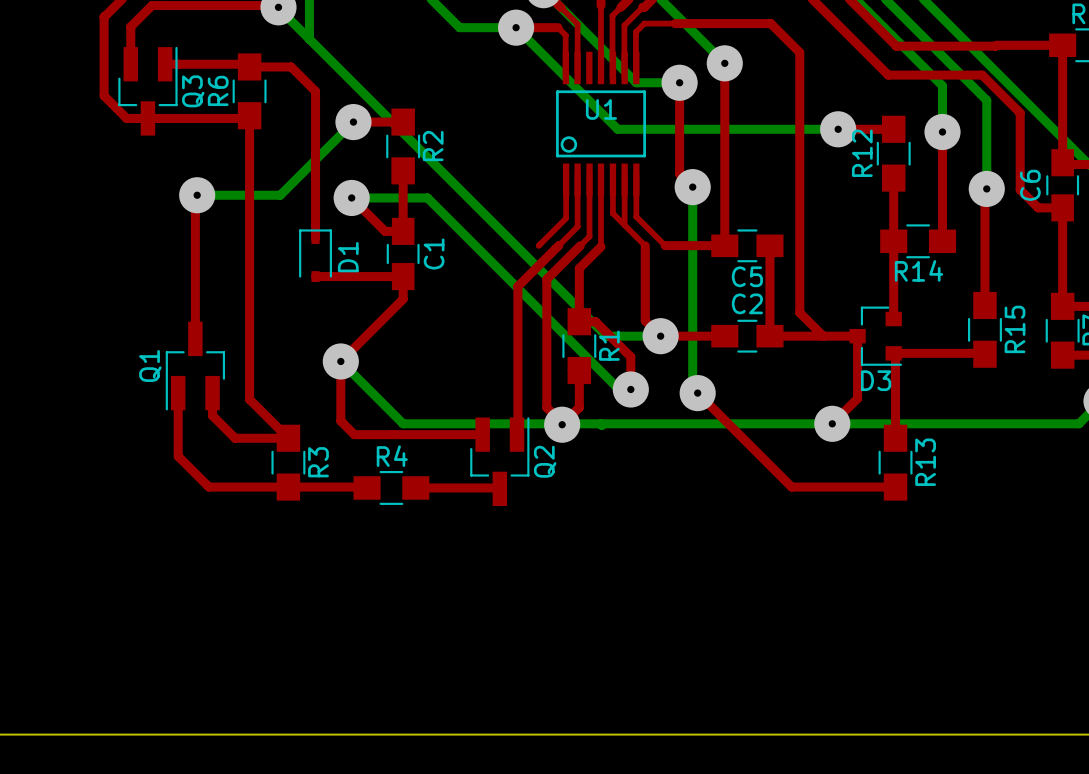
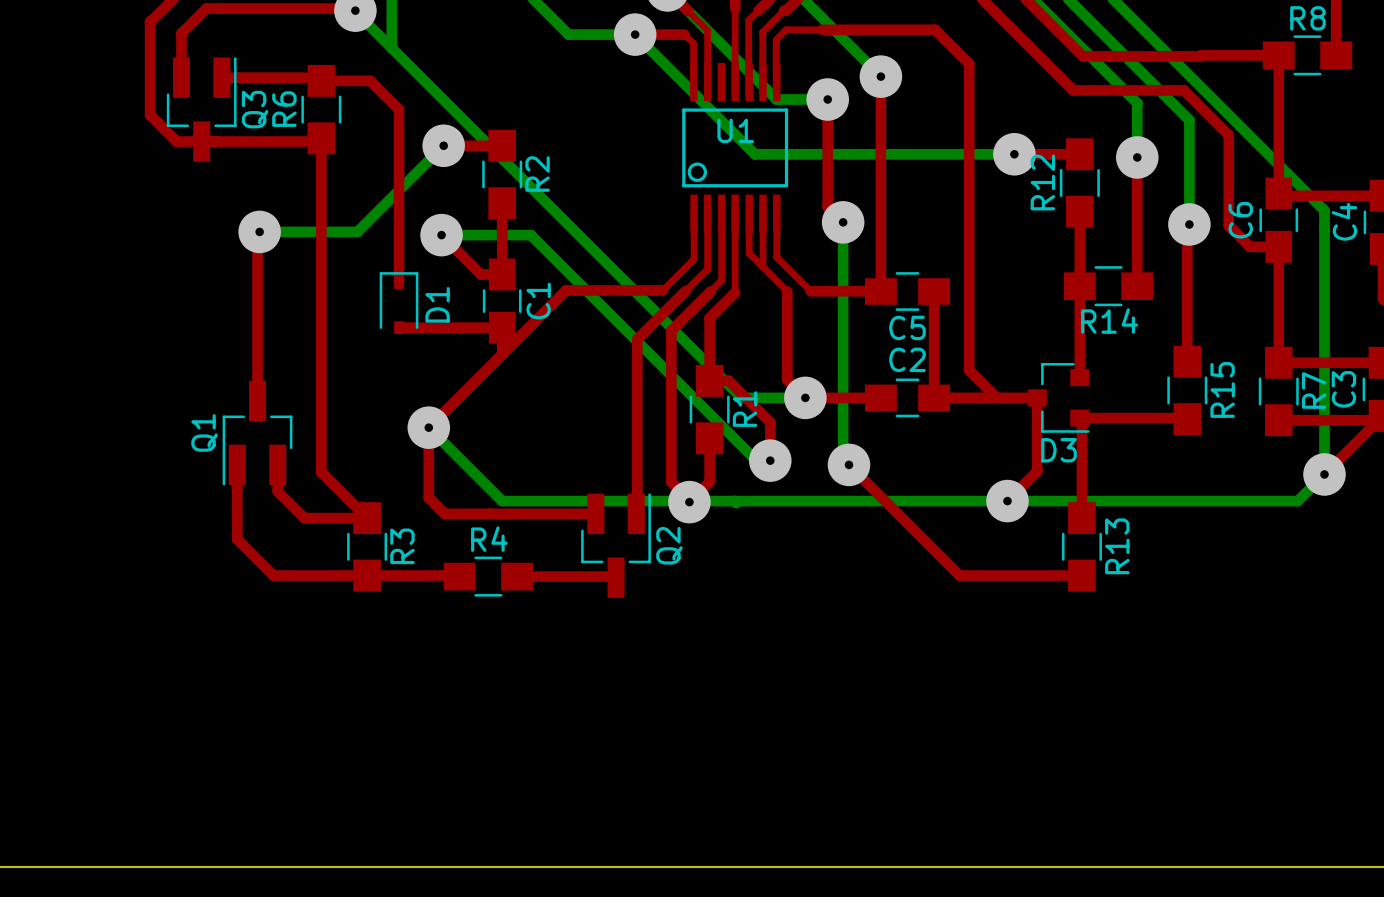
top track: none -> (662, 290) (566, 290) (502, 354)

